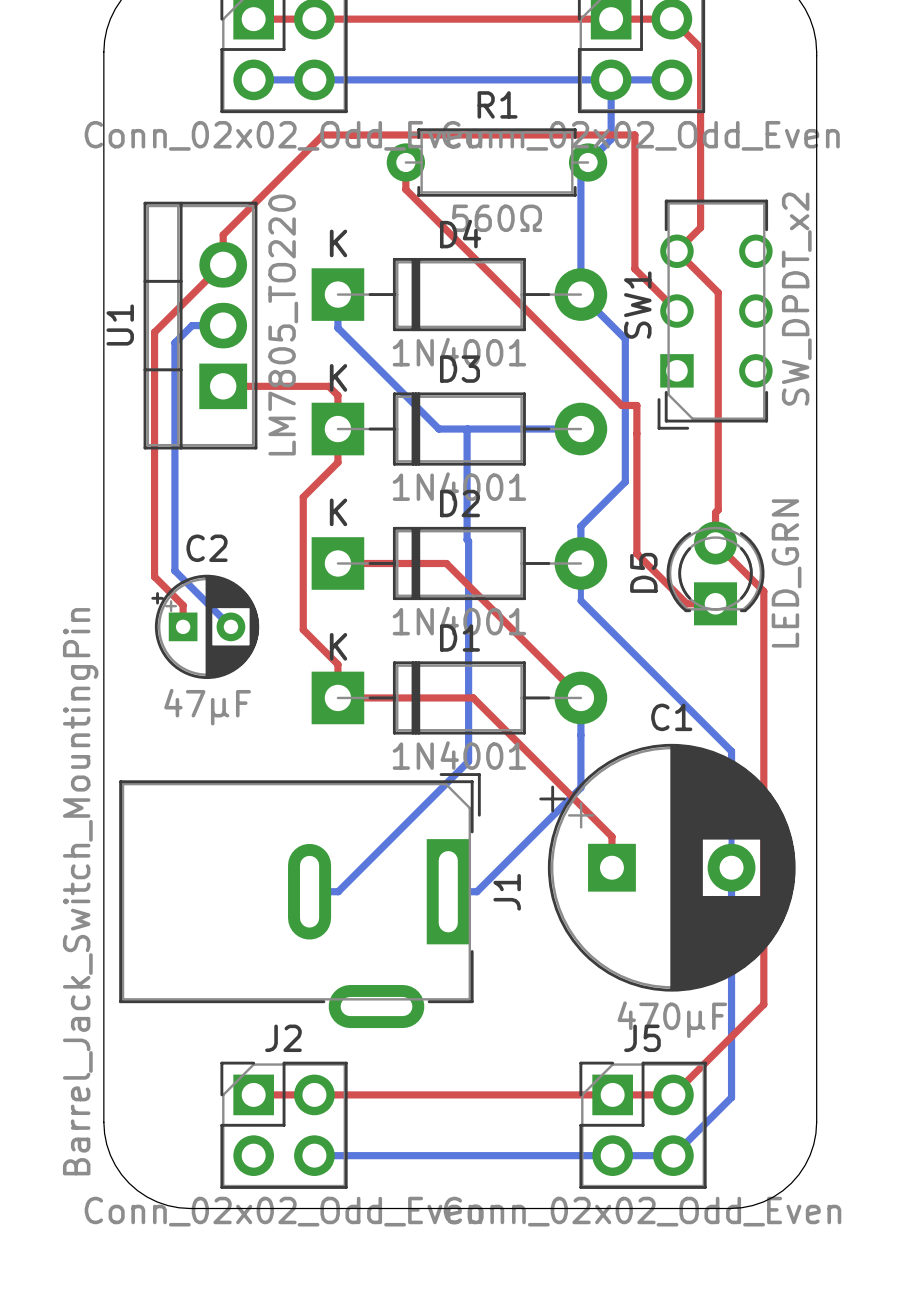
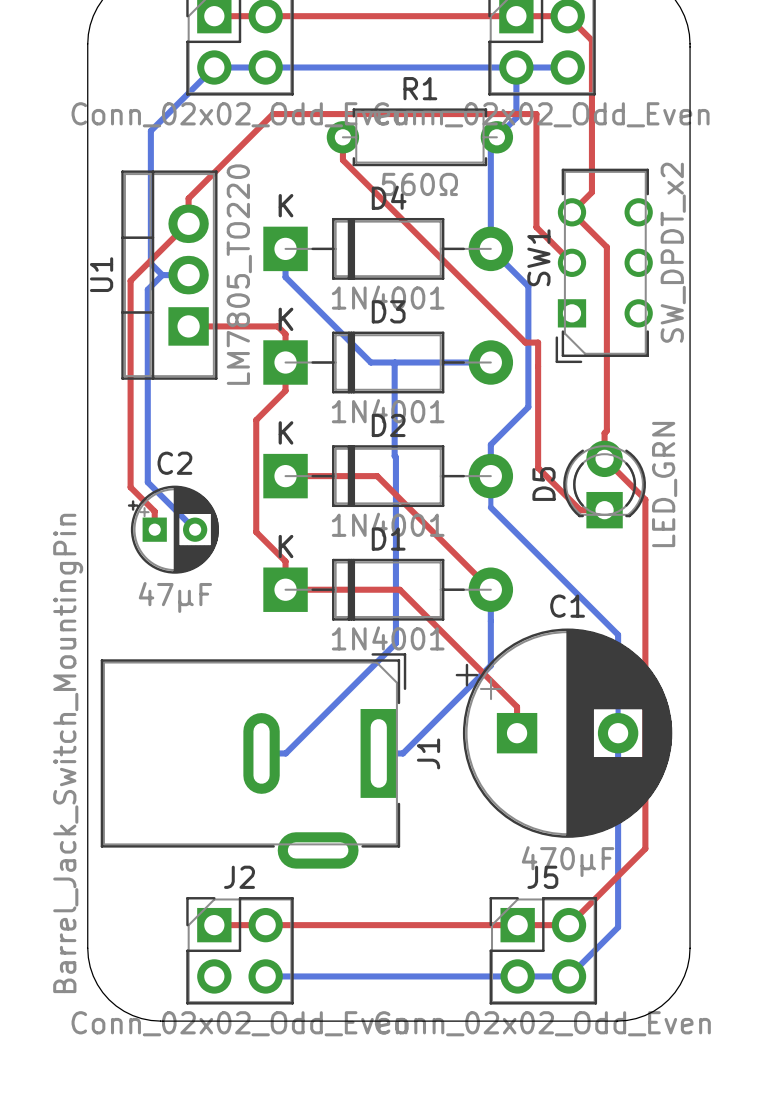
bottom track: none -> (214, 67) (150, 130) (150, 263) (162, 275)

